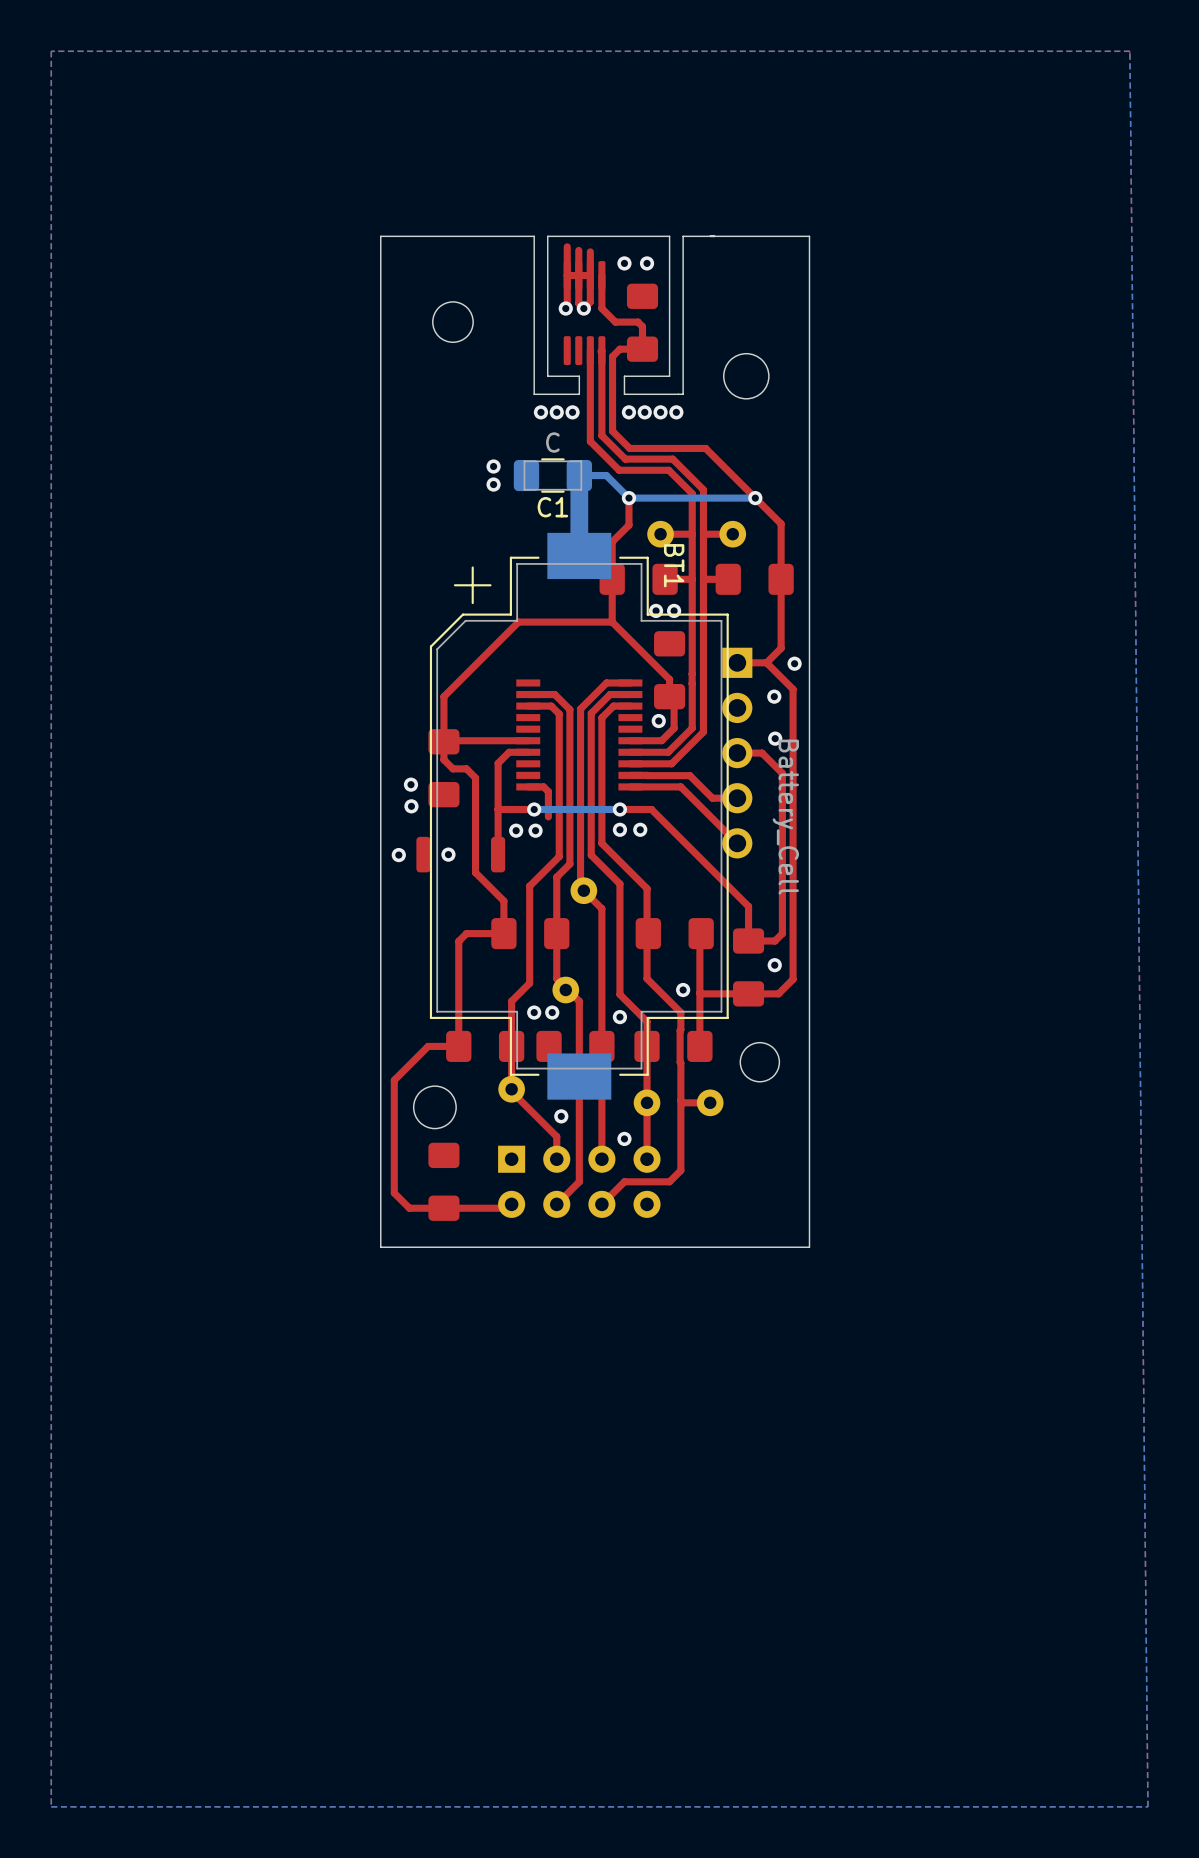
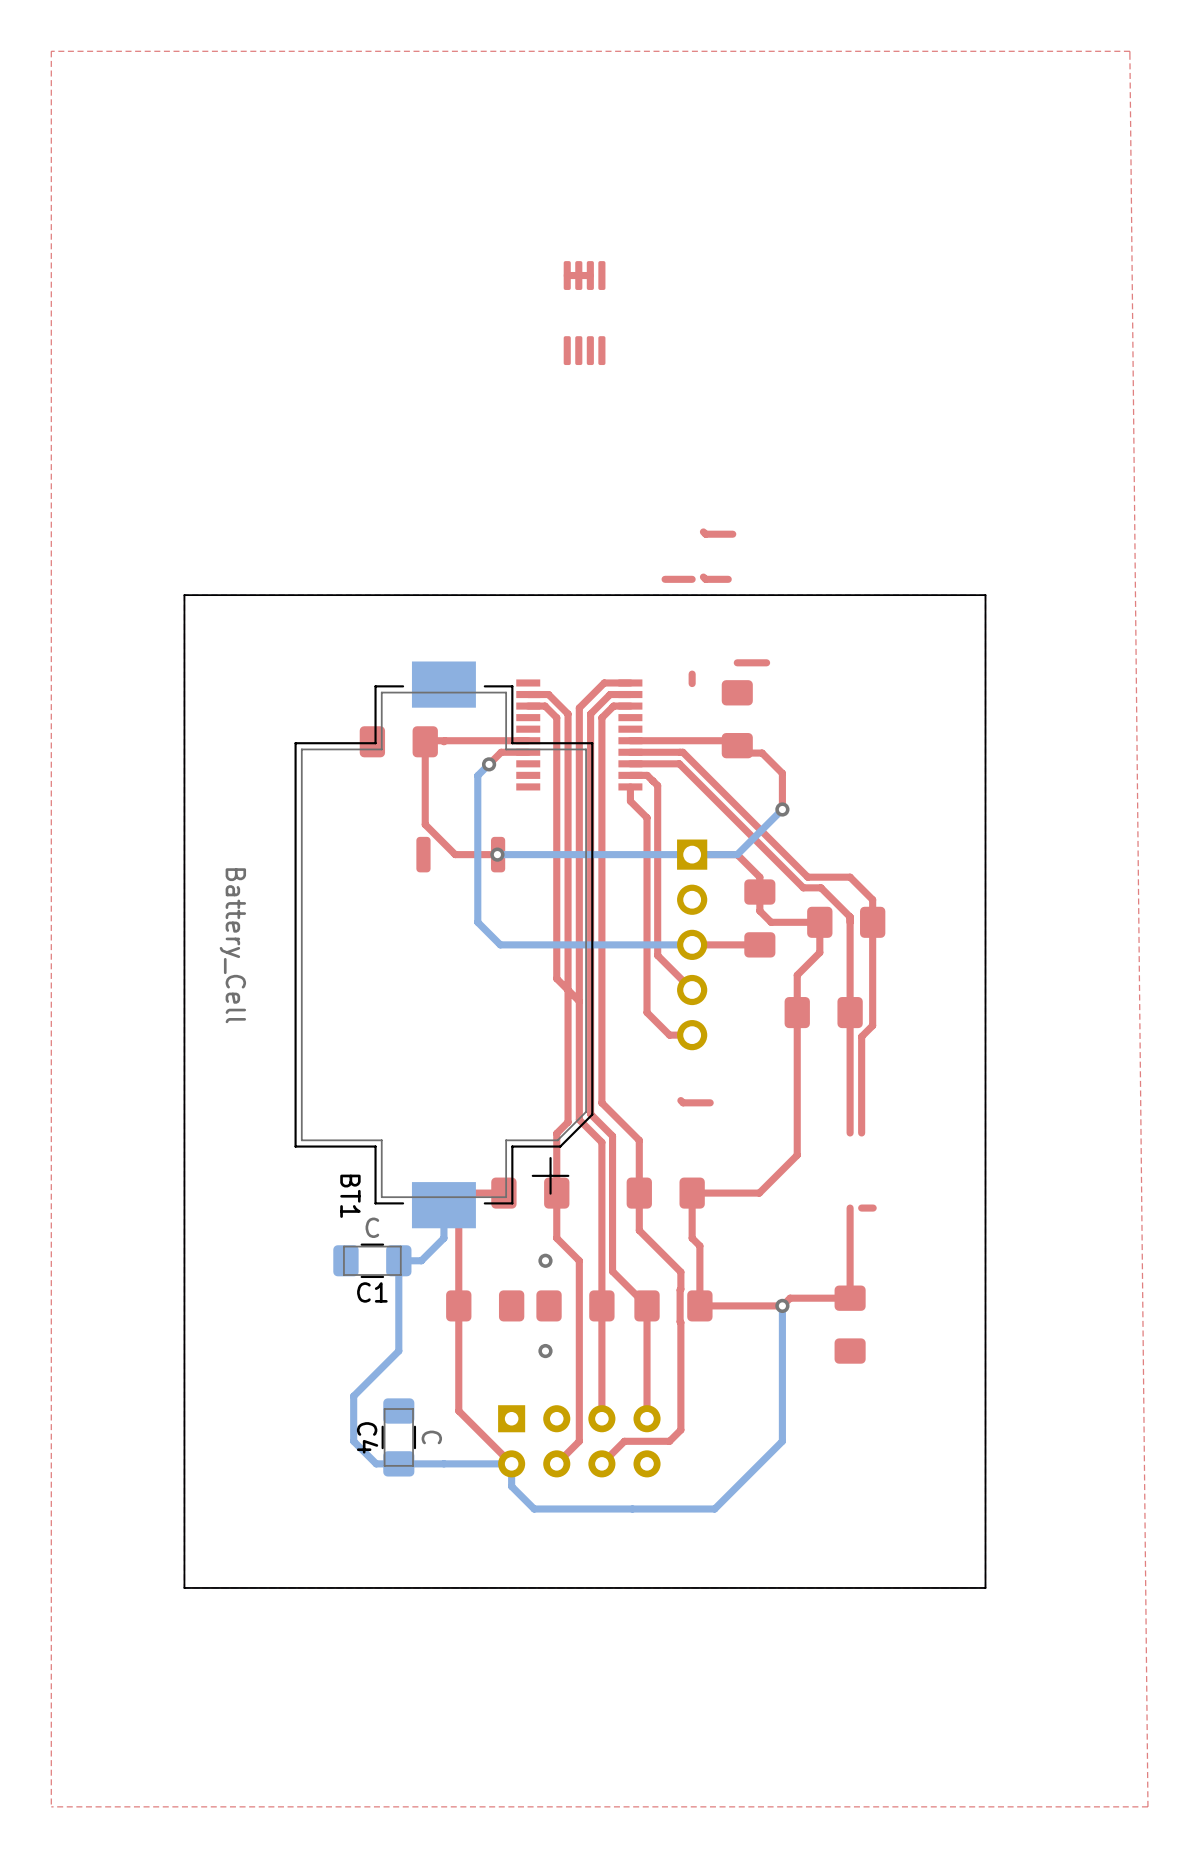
bottom zone outline: (1129, 51) (1147, 1806) (51, 1806) (51, 51) (1129, 51) -> none
board edge: (809, 236) (683, 236) (683, 394) (624, 394) (624, 376) (669, 376) (669, 236) (547, 236) (547, 376) (579, 376) (579, 394) (534, 394) (534, 236) (380, 236) (380, 1247) (809, 1247) (809, 236) -> none
top track: (567, 246) (565, 308) -> none
top track: (578, 250) (578, 303) (583, 308) (590, 302) (590, 251) -> none
via: (624, 263) -> none
via: (647, 263) -> none
top track: (601, 275) (601, 308) (615, 322) (637, 322) (642, 326) (642, 349) (619, 349) (612, 356) (612, 431) (629, 448) (705, 448) (781, 523) (781, 648) (766, 662) (793, 689) (793, 979) (778, 993) (699, 993) -> none
round board edge: [432, 301, 474, 343] -> none
via: (565, 308) -> none
via: (583, 308) -> none
part: (642, 322) -> none
top track: (590, 350) (590, 441) (619, 470) (668, 470) (692, 493) (692, 674) -> none
top track: (601, 351) (601, 435) (625, 459) (672, 459) (703, 489) (703, 732) (671, 763) -> (850, 1132) (850, 916) (821, 887) (803, 887) (679, 763) (671, 763)
round board edge: [723, 353, 770, 400] -> none
via: (540, 412) -> none
via: (556, 412) -> none
via: (572, 412) -> none
via: (628, 412) -> none
via: (644, 412) -> none
via: (660, 412) -> none
via: (676, 412) -> none
via: (493, 466) -> none
C1 position: (552, 475) -> (372, 1260)
via: (493, 484) -> none
top track: (628, 498) (628, 525) (612, 541) (612, 622) -> none
via: (628, 498) -> none
bottom track: (755, 498) (628, 498) (606, 475) (579, 475) (579, 555) -> none
via: (755, 498) -> none
part: (660, 534) -> none
top track: (692, 534) (665, 534) -> none
part: (732, 534) -> none
part: (638, 579) -> none
part: (754, 579) -> none
board edge: none -> (985, 595) (184, 595) (184, 1587) (985, 1587) (985, 595)
via: (656, 610) -> none
via: (674, 610) -> none
top track: (612, 622) (669, 679) (669, 696) (674, 701) (674, 728) (661, 740) -> (737, 741) (661, 740)
top track: (612, 622) (518, 622) (443, 696) (443, 759) (452, 768) (466, 768) (475, 777) (475, 872) (503, 901) (503, 933) (466, 933) (458, 941) (458, 1046) (428, 1046) (394, 1080) (394, 1193) (409, 1208) (507, 1208) (511, 1204) -> none
via: (794, 663) -> none
part: (669, 670) -> none
top track: (606, 682) (580, 708) (580, 887) (601, 908) -> (606, 682) (604, 682) (579, 707) (579, 1001)
top track: (692, 683) (692, 728) (668, 752) -> (861, 1132) (861, 1036) (872, 1025) (872, 899) (850, 877) (807, 877) (682, 752) (668, 752)
top track: (548, 694) (554, 694) (569, 709) (569, 864) (556, 877) -> (545, 706) (556, 717) (556, 877)
via: (774, 696) -> none
top track: (545, 706) (551, 706) (559, 714) (559, 856) (529, 886) (529, 983) (511, 1001) (511, 1091) (556, 1136) -> (548, 694) (568, 714) (568, 1122) (556, 1133) (556, 1136)
top track: (591, 713) (591, 855) (619, 883) (619, 994) (647, 1021) (647, 1159) -> (591, 713) (590, 1114) (612, 1136) (612, 1271) (647, 1305) (647, 1418)
part: none -> (737, 719)
via: (658, 721) -> none
via: (775, 738) -> none
top track: (509, 752) (498, 763) (498, 854) -> (445, 740) (425, 741) (425, 824) (455, 854) (497, 854)
top track: none -> (509, 752) (501, 752) (489, 764)
part position: (737, 753) -> (692, 944)
bottom track: none -> (489, 764) (477, 775) (477, 922) (500, 944) (692, 944)
via: none -> (489, 764)
part rotation: 0° (443, 768) -> 90° clockwise (398, 741)
part position: (443, 768) -> (398, 741)
top track: (647, 775) (689, 775) (712, 798) (737, 798) -> (647, 775) (657, 785) (657, 955) (692, 990)
via: (410, 784) -> none
top track: (528, 786) (543, 786) (548, 791) (548, 816) -> none
top track: (630, 786) (680, 786) (737, 843) -> (630, 786) (630, 801) (647, 817) (647, 888)
via: (411, 806) -> none
top track: (534, 809) (498, 809) -> none
via: (534, 809) -> none
bottom track: (619, 809) (534, 809) -> none
via: (619, 809) -> none
top track: (782, 809) (782, 933) (774, 941) (748, 941) (748, 906) (651, 809) (619, 809) -> none
bottom track: none -> (782, 809) (737, 854) (497, 854)
via: none -> (782, 809)
BT1 rotation: 0° (579, 816) -> 180° (443, 944)
via: (619, 829) -> none
via: (640, 829) -> none
via: (516, 830) -> none
via: (535, 830) -> none
top track: (601, 843) (647, 888) -> (601, 843) (601, 908)
via: (448, 854) -> none
via: none -> (497, 854)
top track: none -> (692, 854) (737, 854) (759, 877) (759, 911) (771, 922) (819, 922) (819, 952) (797, 975) (797, 1155) (759, 1193) (692, 1193) (692, 1238) (699, 1245) (699, 1305) (782, 1305) (790, 1298) (850, 1298) (850, 1208)
via: (398, 855) -> none
part: (583, 890) -> none
part: none -> (759, 918)
part: none -> (846, 922)
part: (530, 933) -> none
part: (674, 933) -> none
top track: (701, 933) (699, 1046) -> none
top track: none -> (759, 944) (692, 944)
via: (774, 965) -> none
part: (748, 967) -> none
top track: (647, 978) (680, 1012) (680, 1170) (669, 1181) (624, 1181) (601, 1204) -> (647, 978) (647, 1012) (669, 1035) (692, 1035)
part: (565, 990) -> none
via: (683, 990) -> none
via: (534, 1012) -> none
via: (552, 1012) -> none
part: none -> (823, 1012)
via: (619, 1017) -> none
round board edge: [739, 1042, 780, 1083] -> none
part: (485, 1046) -> none
part: (575, 1046) -> none
part: (673, 1046) -> none
round board edge: [413, 1085, 457, 1130] -> none
part: (511, 1089) -> none
top track: (601, 1102) (601, 1142) -> (579, 1119) (601, 1142)
top track: none -> (601, 1102) (639, 1140) (639, 1230) (680, 1272) (680, 1430) (669, 1441) (624, 1441) (601, 1463)
part: (647, 1102) -> none
part: (710, 1102) -> none
via: (561, 1116) -> none
top track: (579, 1119) (579, 1181) (556, 1204) -> none
via: (624, 1138) -> none
top track: none -> (556, 1159) (556, 1238) (579, 1260) (579, 1441) (556, 1463)
top track: none -> (601, 1159) (601, 1418)
C4 side: top (443, 1181) -> bottom (398, 1437)
part position: (579, 1181) -> (579, 1441)
top track: none -> (503, 1193) (466, 1193) (458, 1200) (458, 1411) (511, 1463)
part: none -> (530, 1193)
part: none -> (665, 1193)
bottom track: none -> (443, 1205) (443, 1238) (421, 1260) (398, 1260) (398, 1351) (353, 1396) (353, 1441) (376, 1463) (398, 1463)
top track: none -> (873, 1208) (861, 1208)
via: none -> (545, 1260)
part: none -> (485, 1305)
part: none -> (575, 1305)
part: none -> (673, 1305)
bottom track: none -> (782, 1305) (782, 1441) (714, 1508) (534, 1508) (511, 1486) (511, 1463) (402, 1463)
via: none -> (782, 1305)
part: none -> (850, 1324)
via: none -> (545, 1351)

